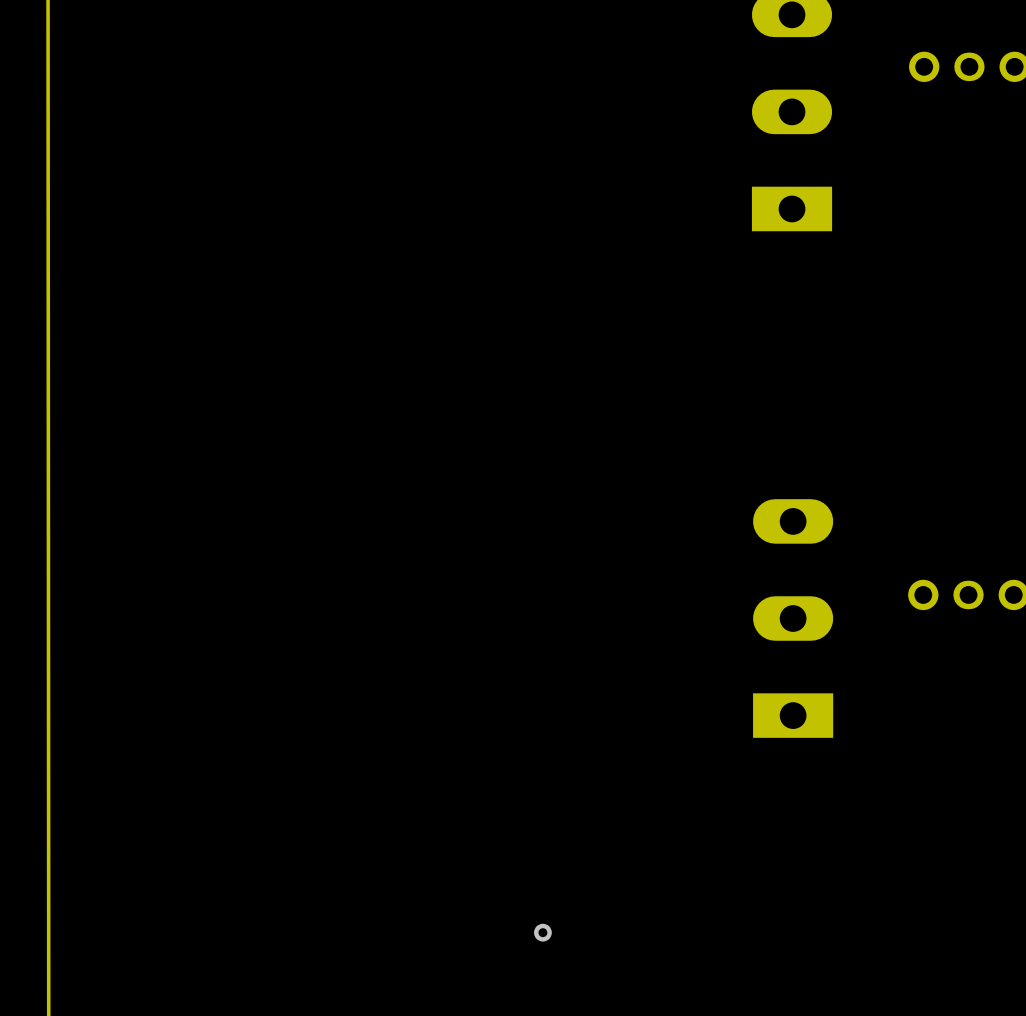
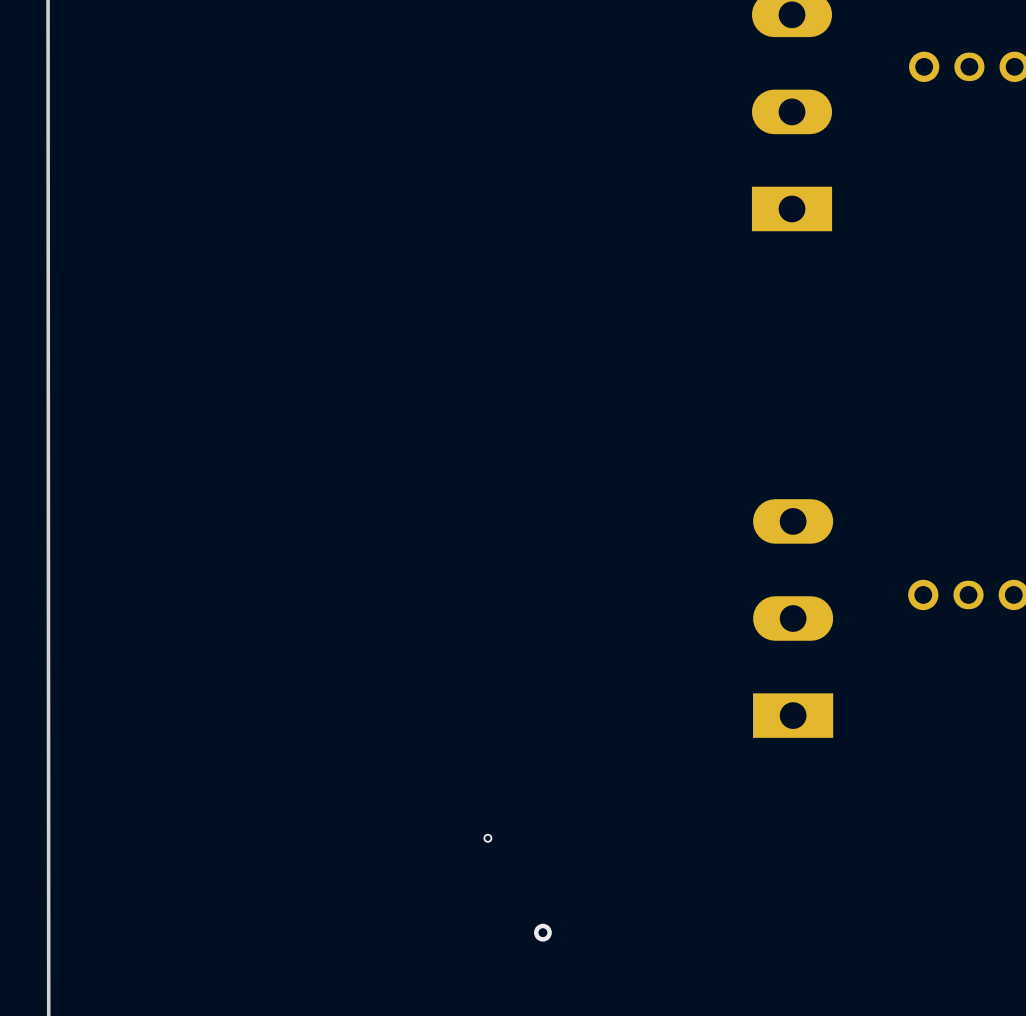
via: none -> (487, 838)

